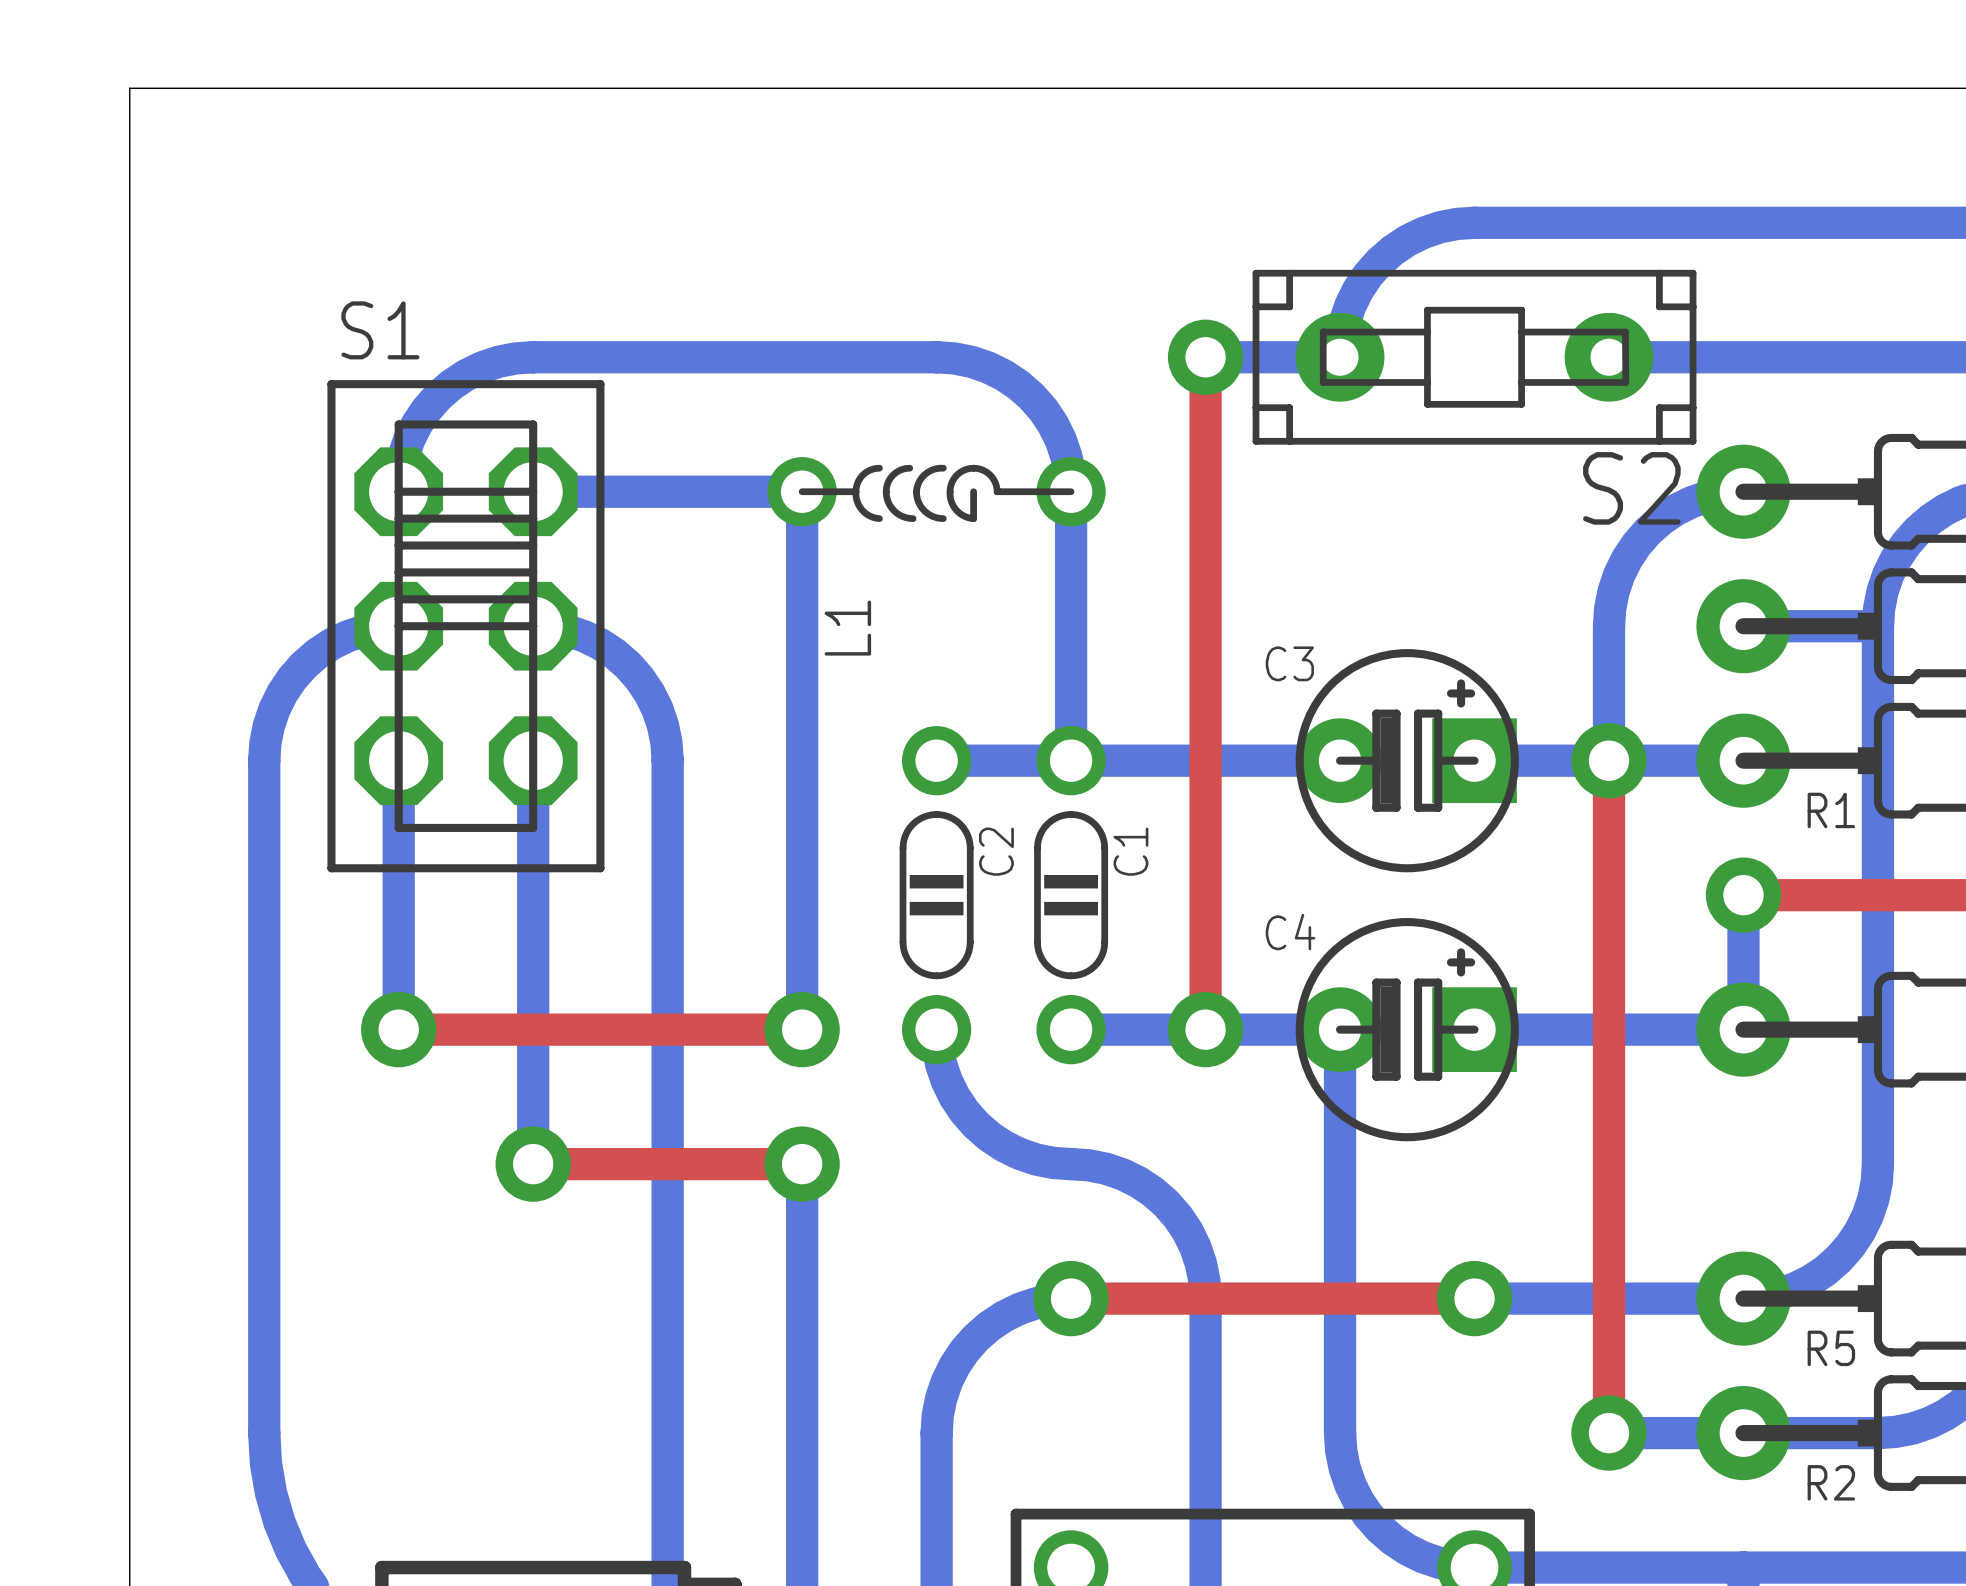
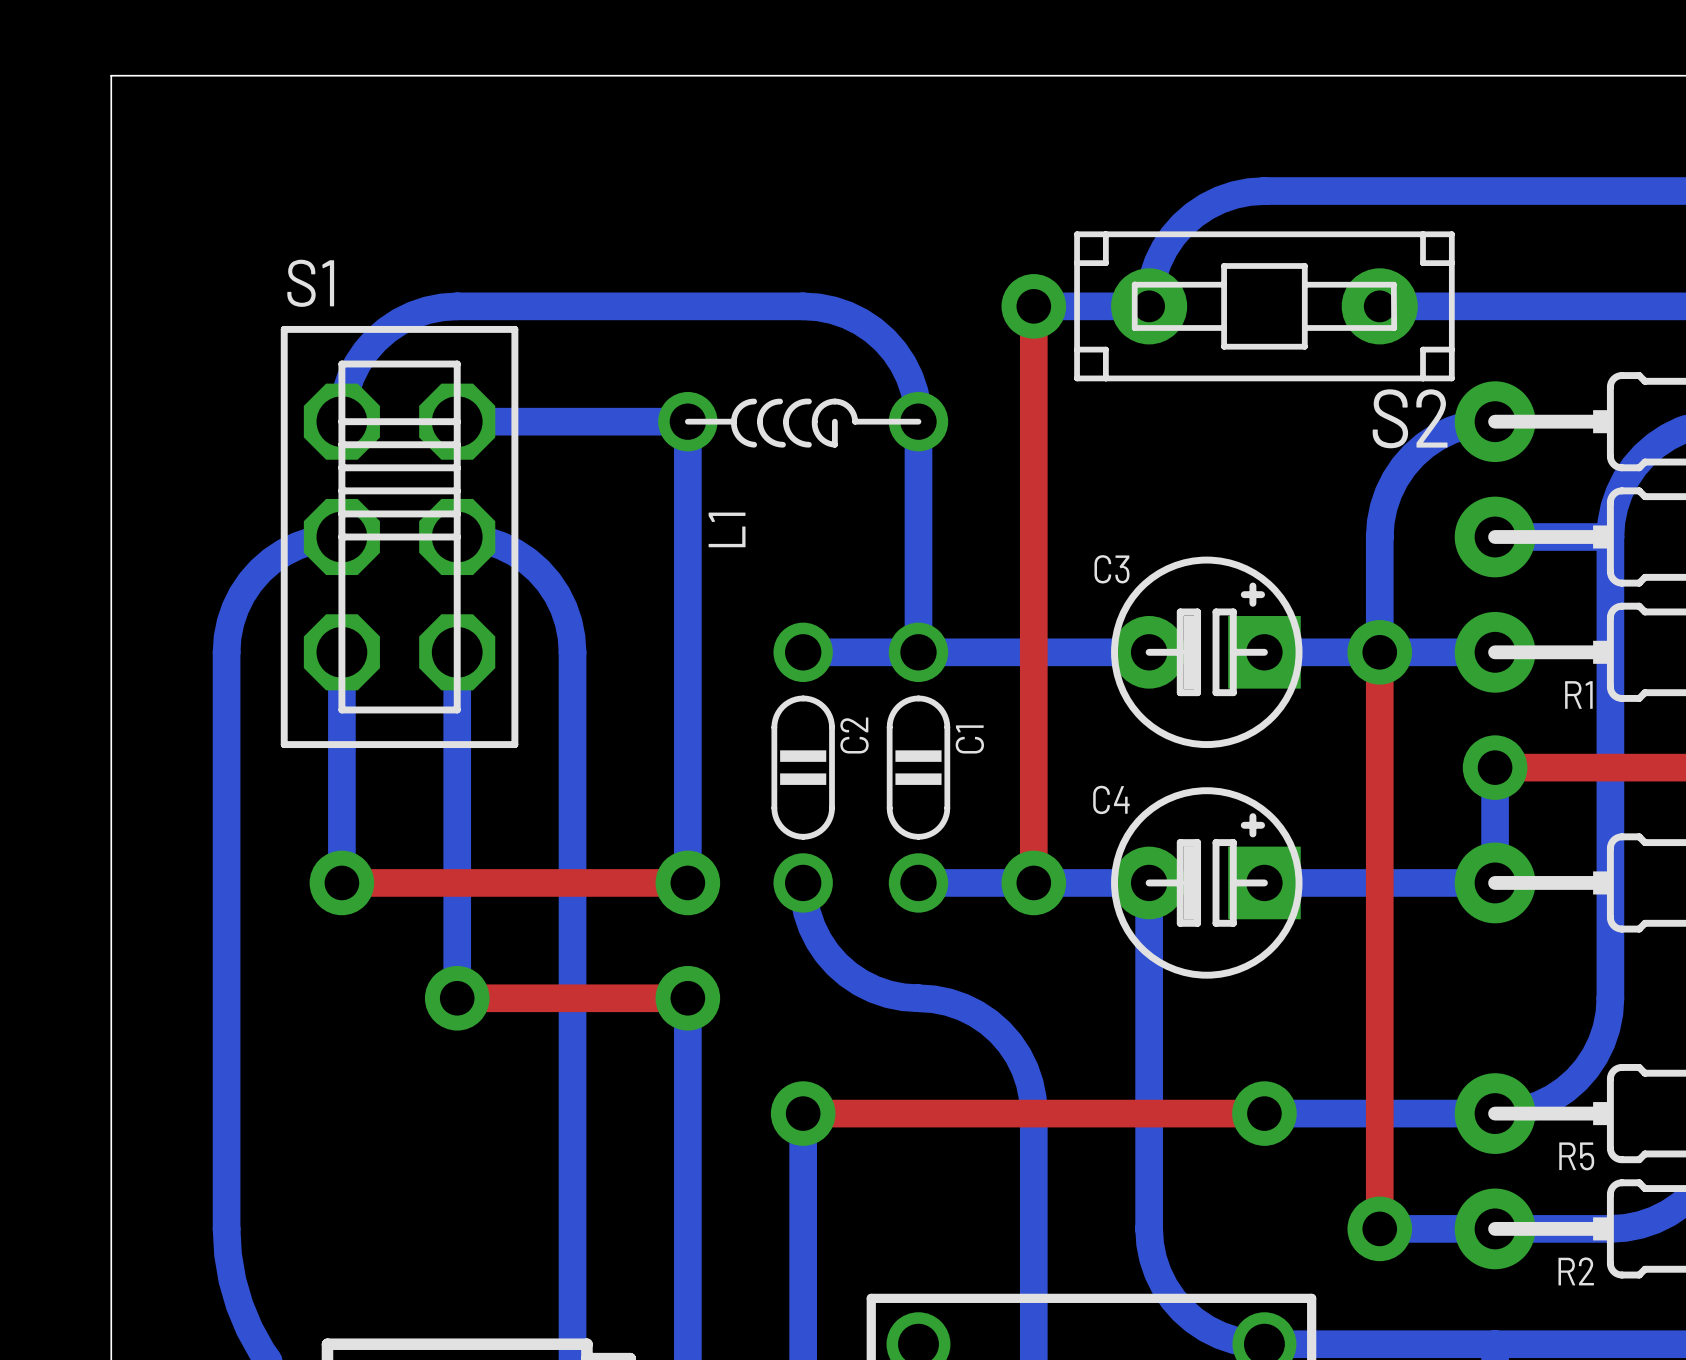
top track: none -> (803, 1113) (918, 1113)
bottom track: (1071, 1298) (1053, 1299) (1019, 1308) (1003, 1316) (976, 1337) (964, 1351) (946, 1381) (941, 1398) (936, 1433) -> (803, 1113) (803, 1228)
via position: (1071, 1298) -> (803, 1113)

